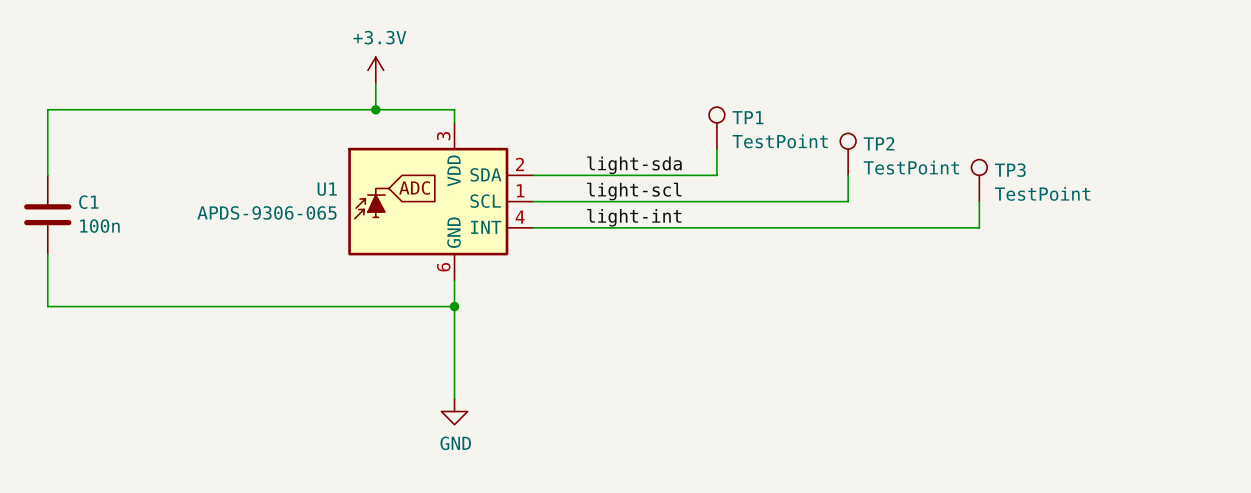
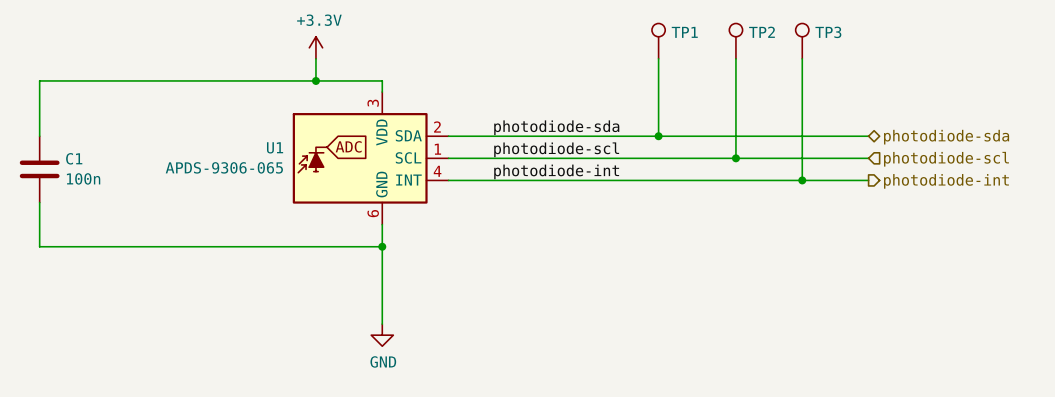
wire: none -> (658, 58) (658, 136)
wire: none -> (735, 58) (735, 158)
wire: none -> (802, 58) (802, 180)
TP1 position: (716, 128) -> (658, 41)
TP1 value: TestPoint (780, 141) -> none
wire: (716, 149) (716, 175) -> (868, 136) (603, 136)
TP2 position: (848, 154) -> (735, 41)
label: light-sda (634, 165) -> photodiode-sda (556, 127)
TP2 value: TestPoint (911, 167) -> none
junction: none -> (658, 136)
wire: (848, 175) (848, 201) -> (868, 158) (713, 158)
hierarchical label: none -> photodiode-sda (946, 137)
TP3 position: (979, 180) -> (802, 41)
label: light-scl (634, 191) -> photodiode-scl (556, 149)
TP3 value: TestPoint (1042, 193) -> none
junction: none -> (735, 158)
wire: (979, 201) (979, 227) -> (868, 180) (824, 180)
hierarchical label: none -> photodiode-scl (946, 159)
label: light-int (634, 217) -> photodiode-int (556, 171)
junction: none -> (802, 180)
hierarchical label: none -> photodiode-int (946, 181)

